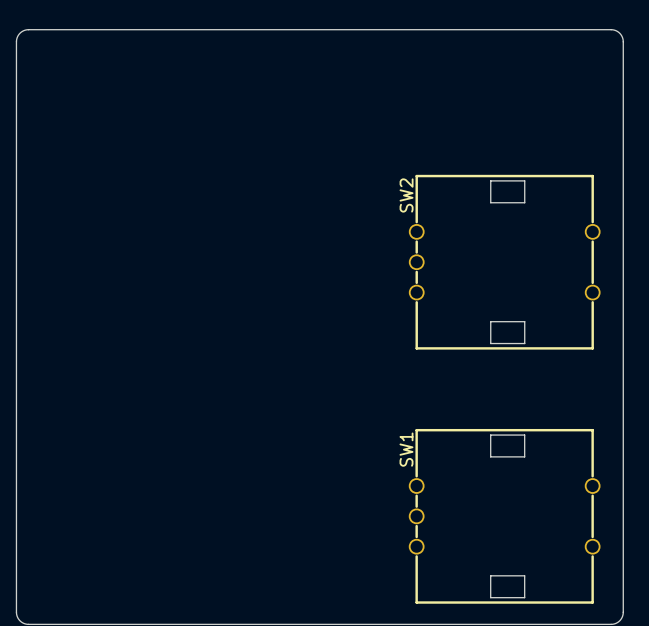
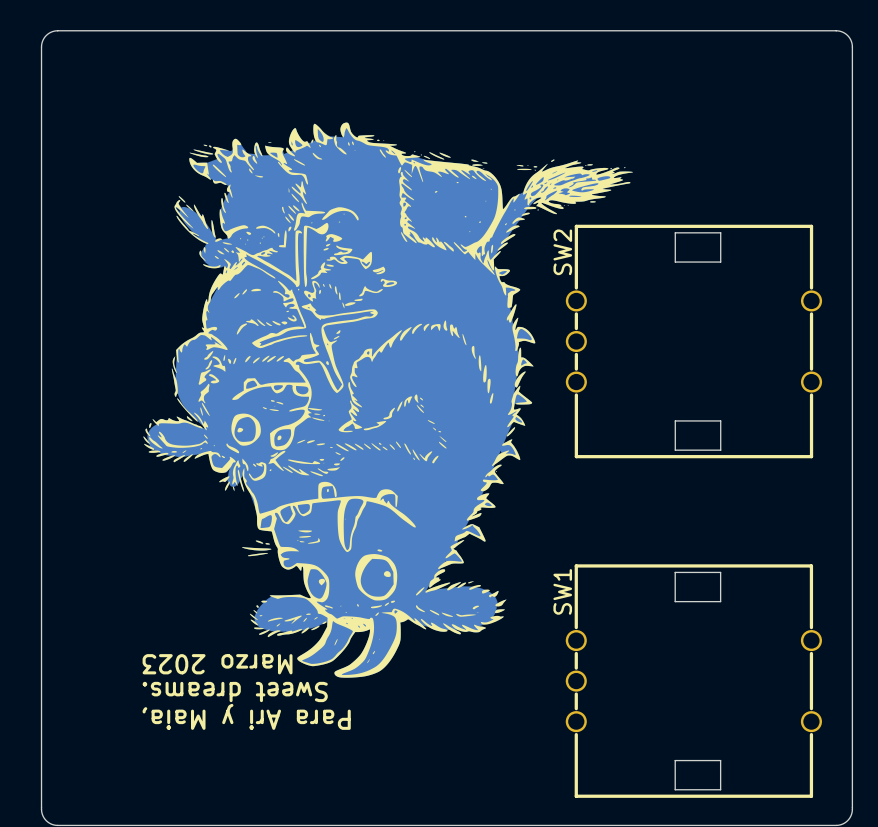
drawing: none -> [143, 122, 633, 678]
text: none -> Marzo 2023 (217, 664)
text: none -> Sweet dreams. (235, 691)
text: none -> Para Ari y Maia, (246, 716)

